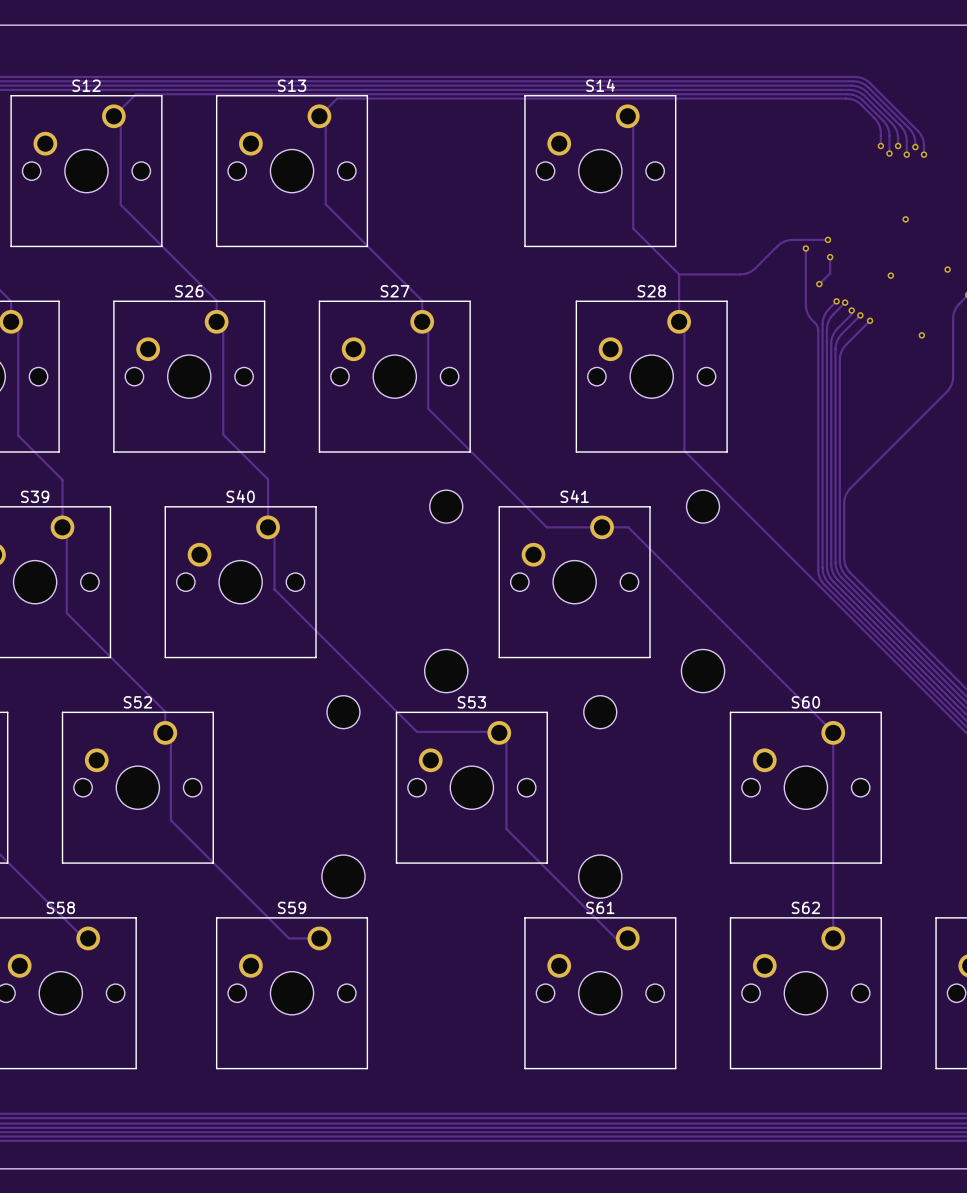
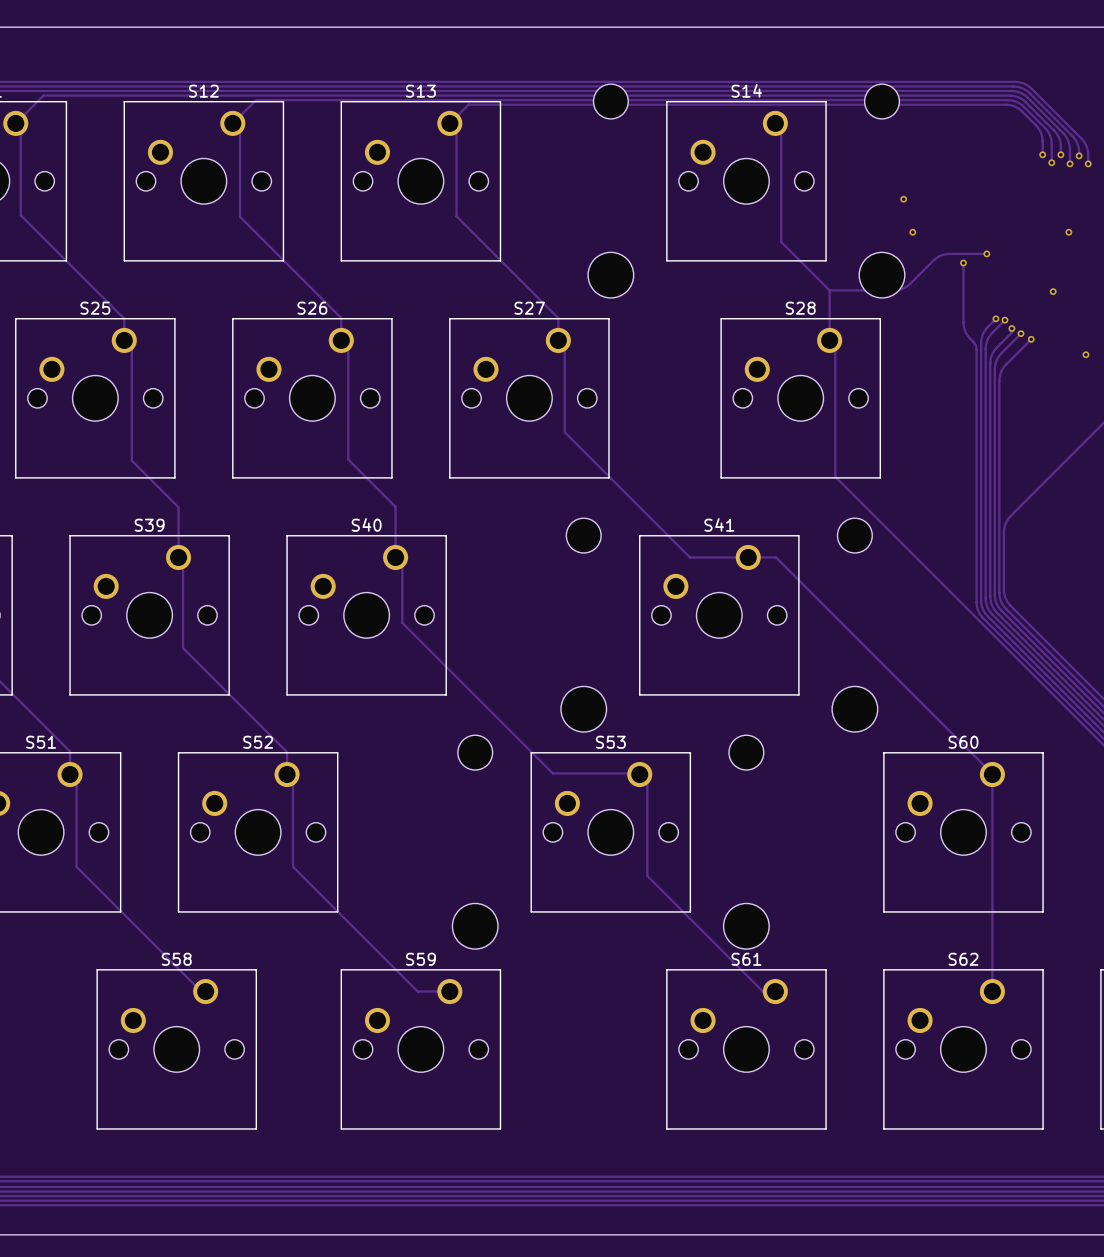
S14 footprint: [524, 95, 677, 248] -> [588, 84, 905, 298]
via: none -> (903, 199)
via: none -> (912, 232)
track: (830, 257) (830, 273) (819, 284) -> none
via: (830, 257) -> none
via: (819, 284) -> none

